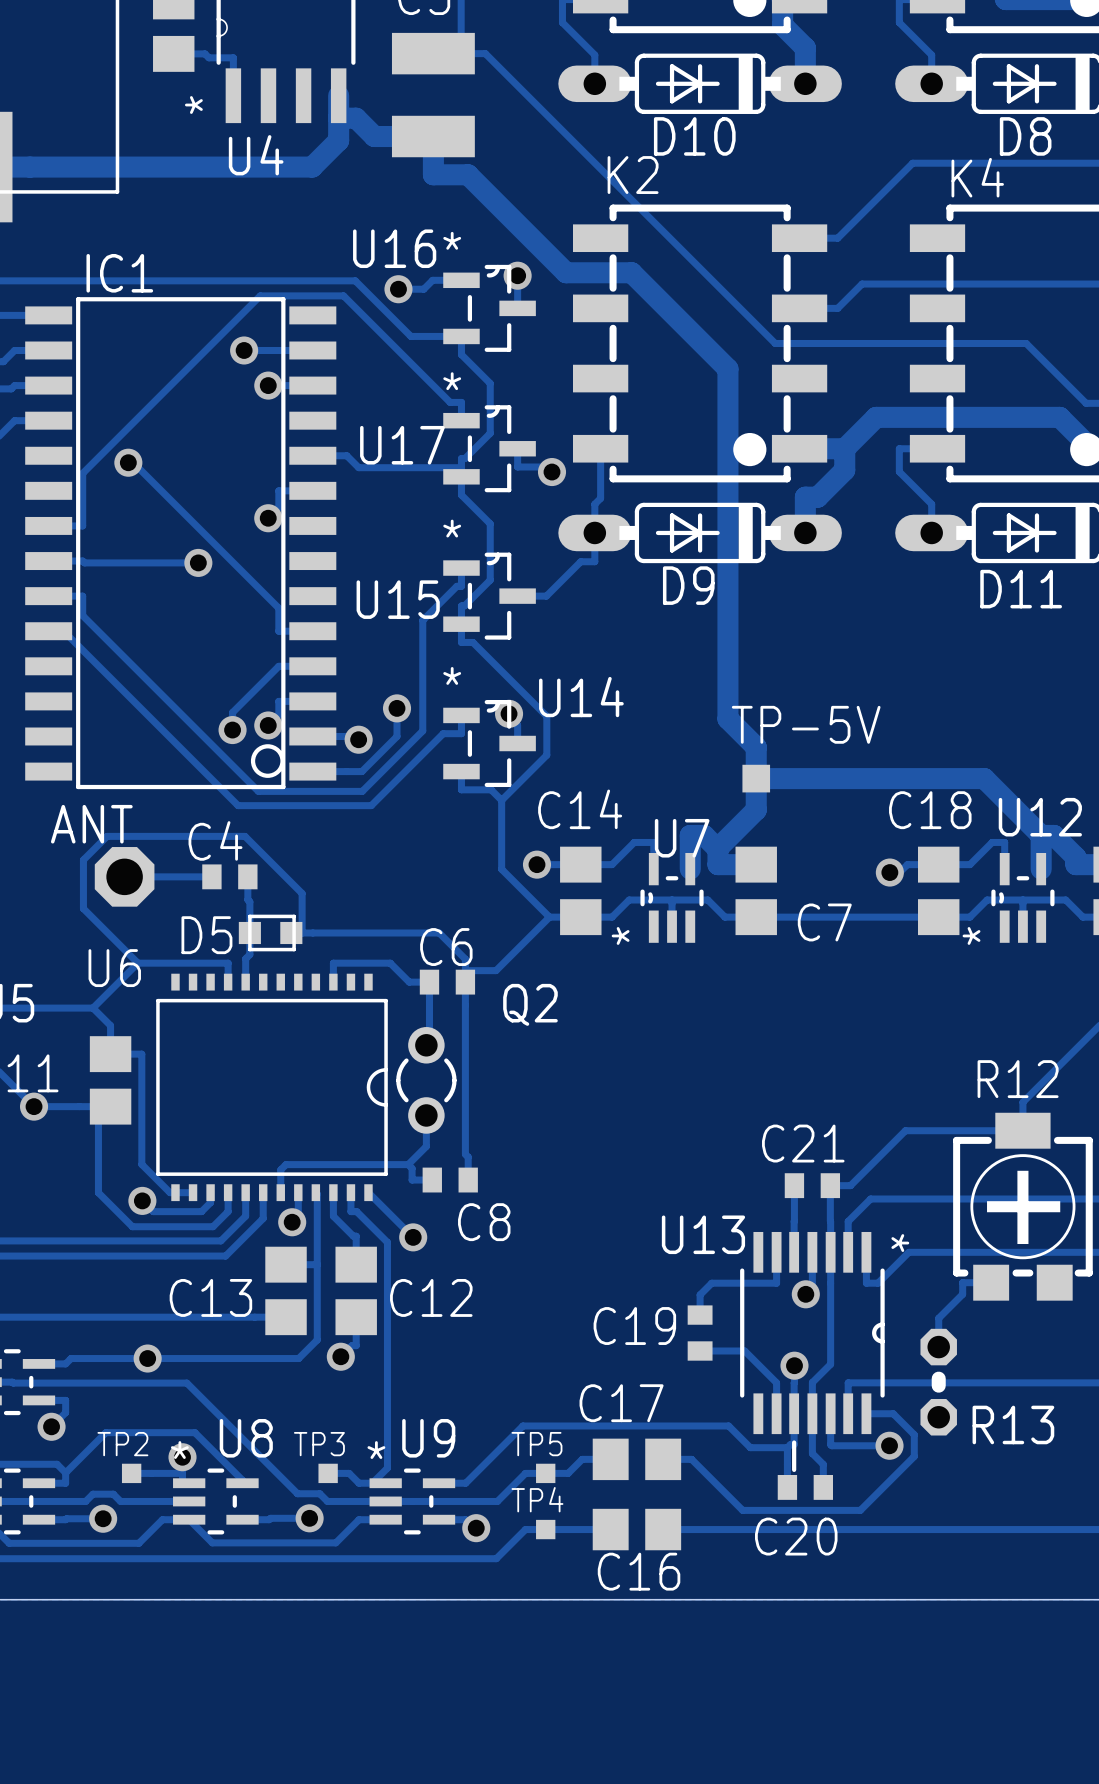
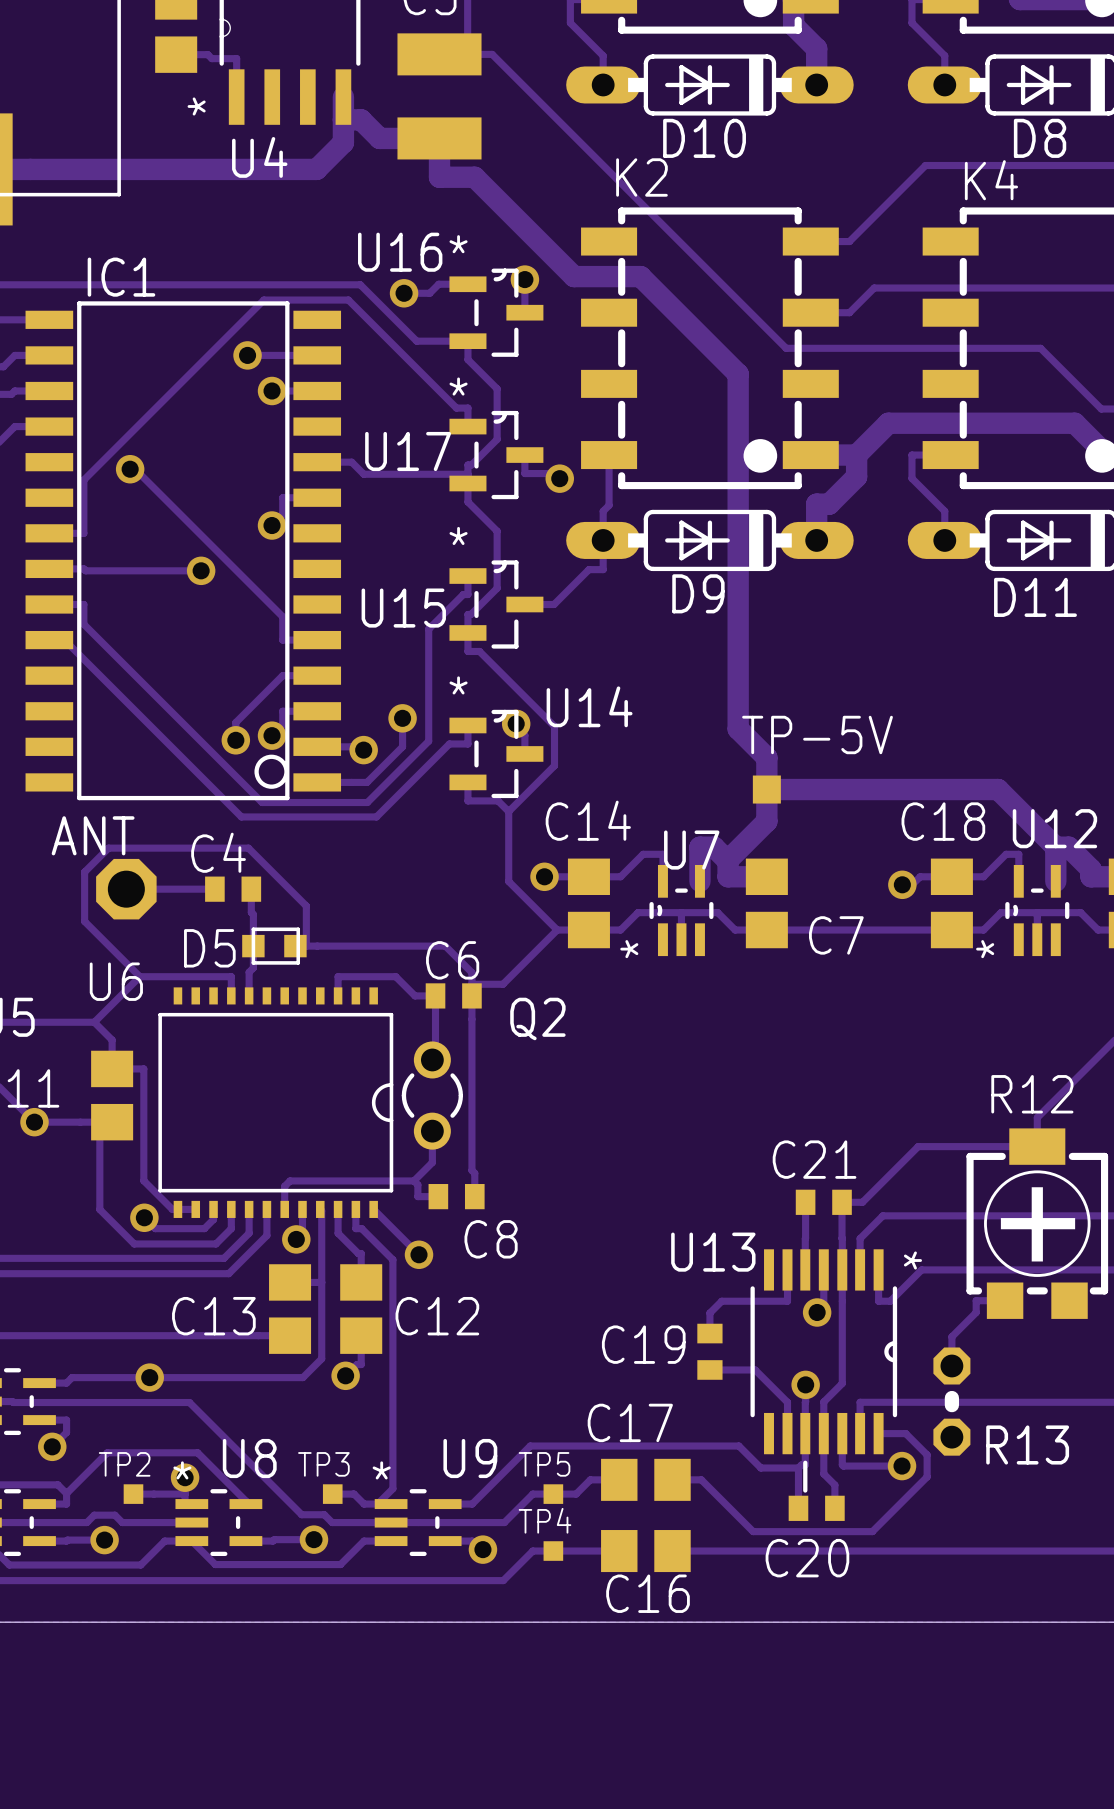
U9 name position: U9 (428, 1438) -> U9 (470, 1458)

